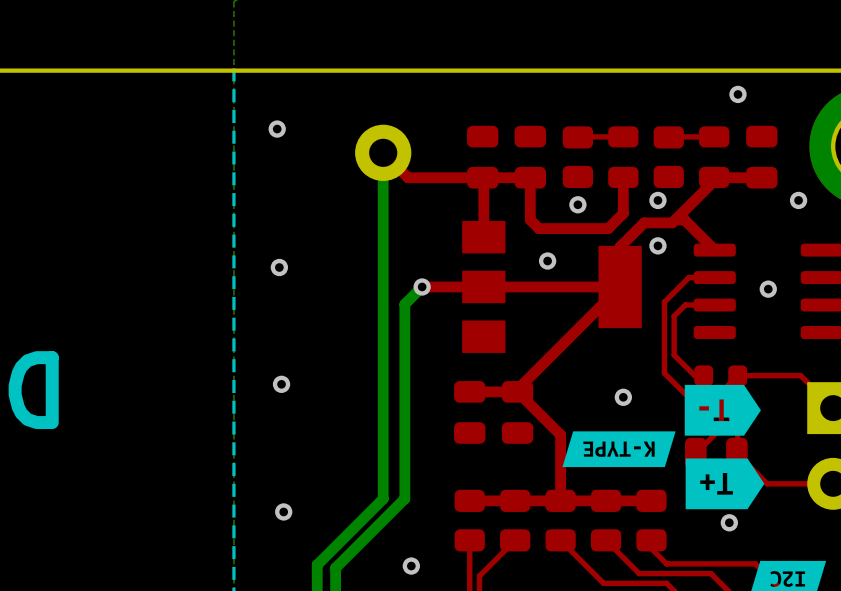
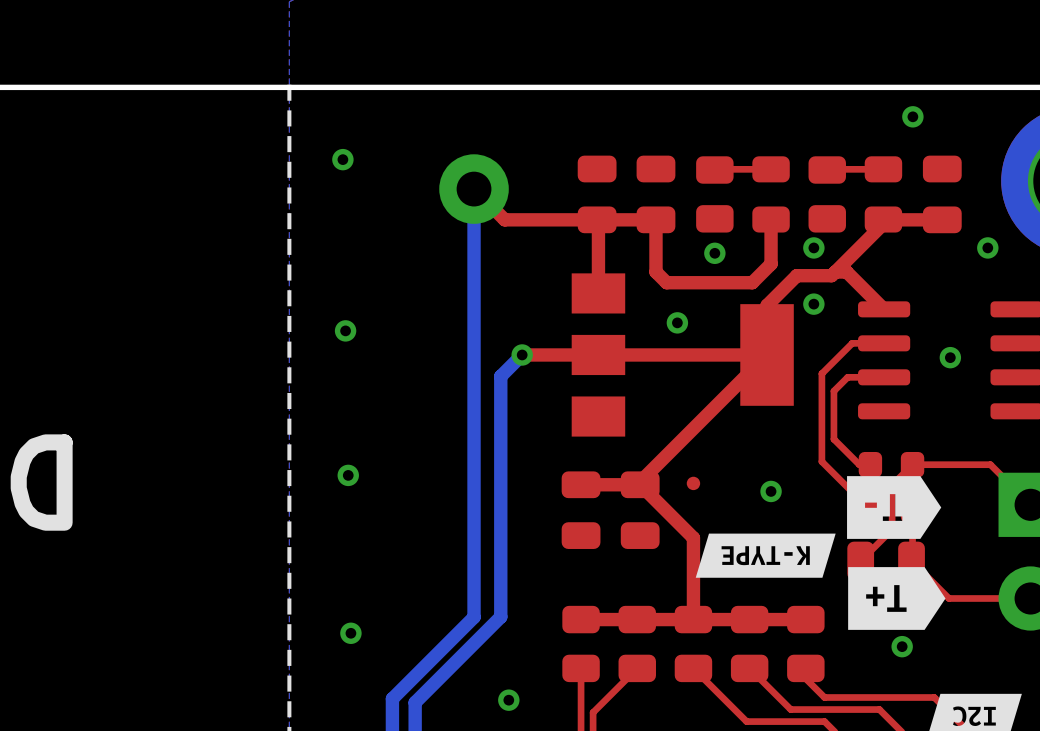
part: none -> (693, 483)

